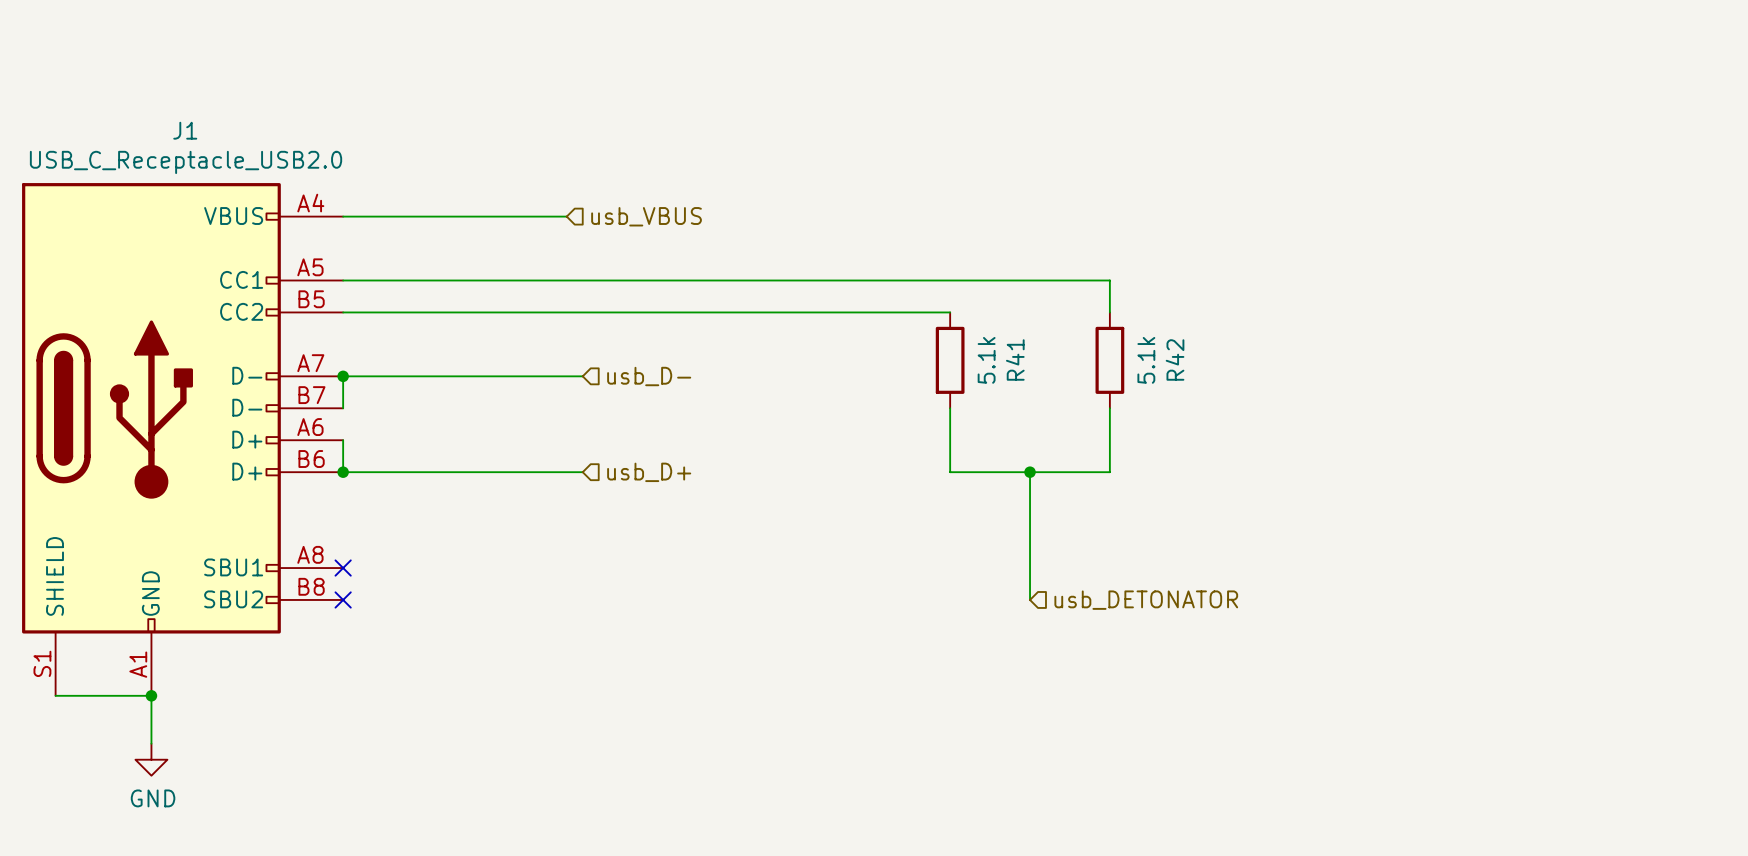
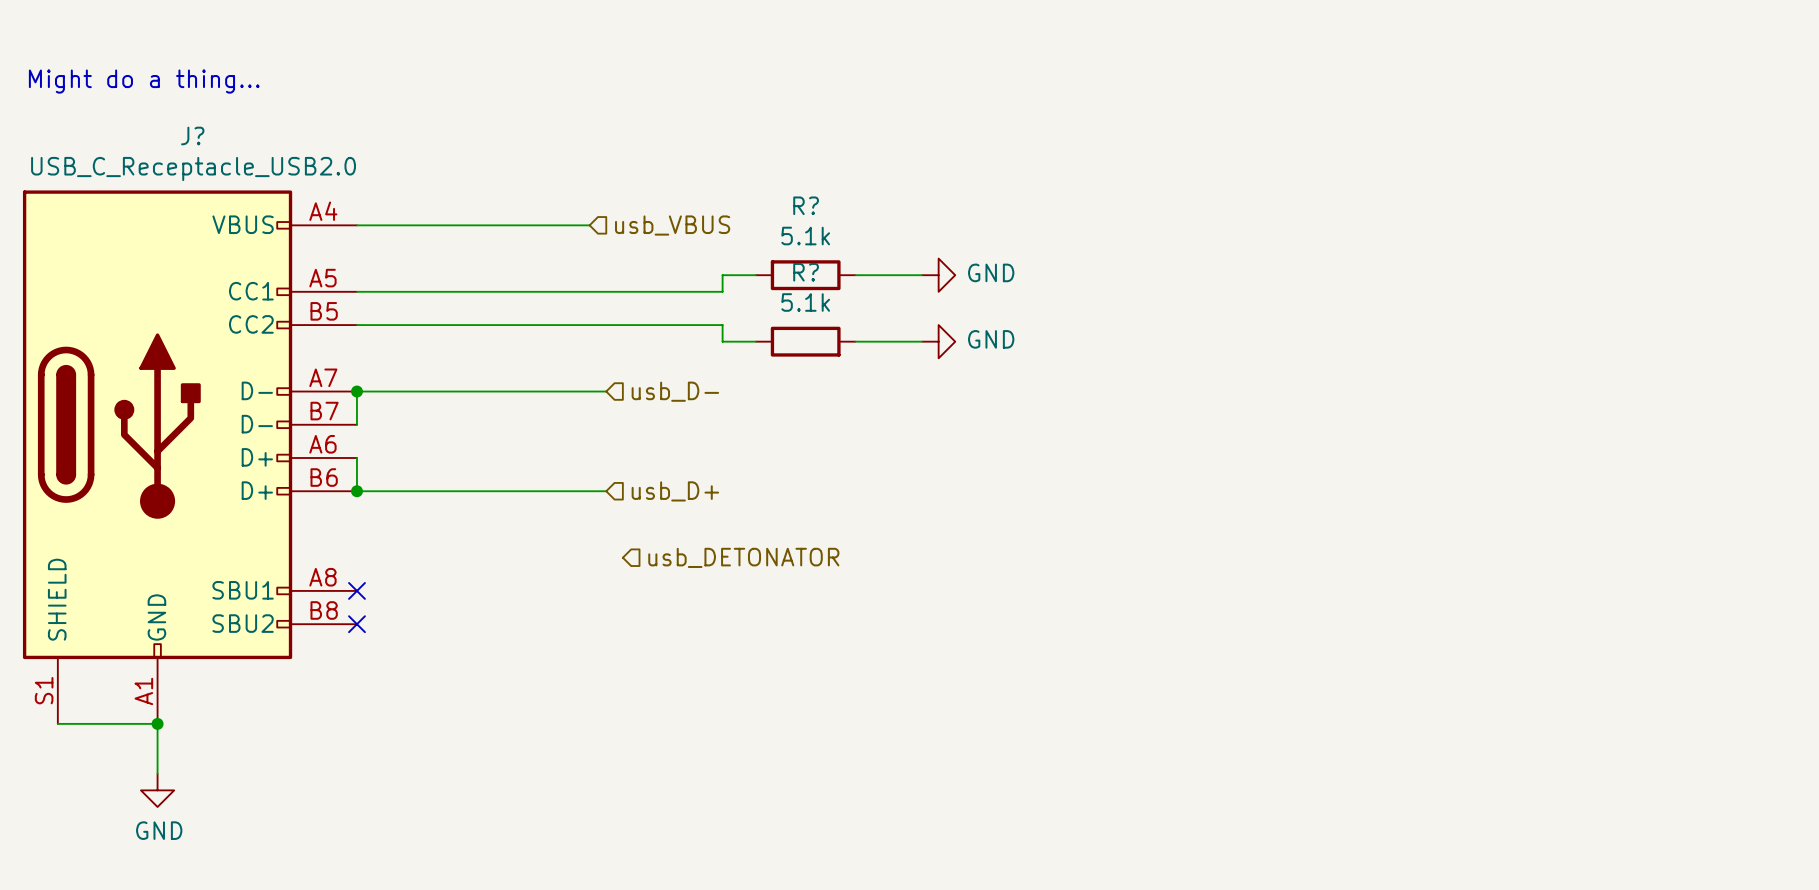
text: none -> Might do a thing... (144, 81)
J1 name: J1 (185, 130) -> J? (192, 135)
R?: none -> 5.1k (805, 275)
wire: none -> (855, 275) (922, 275)
power symbol: none -> GND (938, 275)
wire: (694, 280) (1109, 280) (1109, 312) -> (722, 291) (722, 275) (755, 275)
wire: (694, 312) (950, 312) -> (722, 325) (722, 341) (755, 341)
R?: none -> 5.1k (805, 341)
wire: none -> (855, 341) (922, 341)
power symbol: none -> GND (938, 341)
R41: 5.1k (950, 360) -> none
R42: 5.1k (1109, 360) -> none
wire: (950, 408) (950, 472) (1109, 472) (1109, 408) -> none
wire: (1030, 472) (1030, 599) -> none
junction: (1030, 472) -> none
hierarchical label: none -> usb_DETONATOR (743, 557)
hierarchical label: usb_DETONATOR (1146, 600) -> none

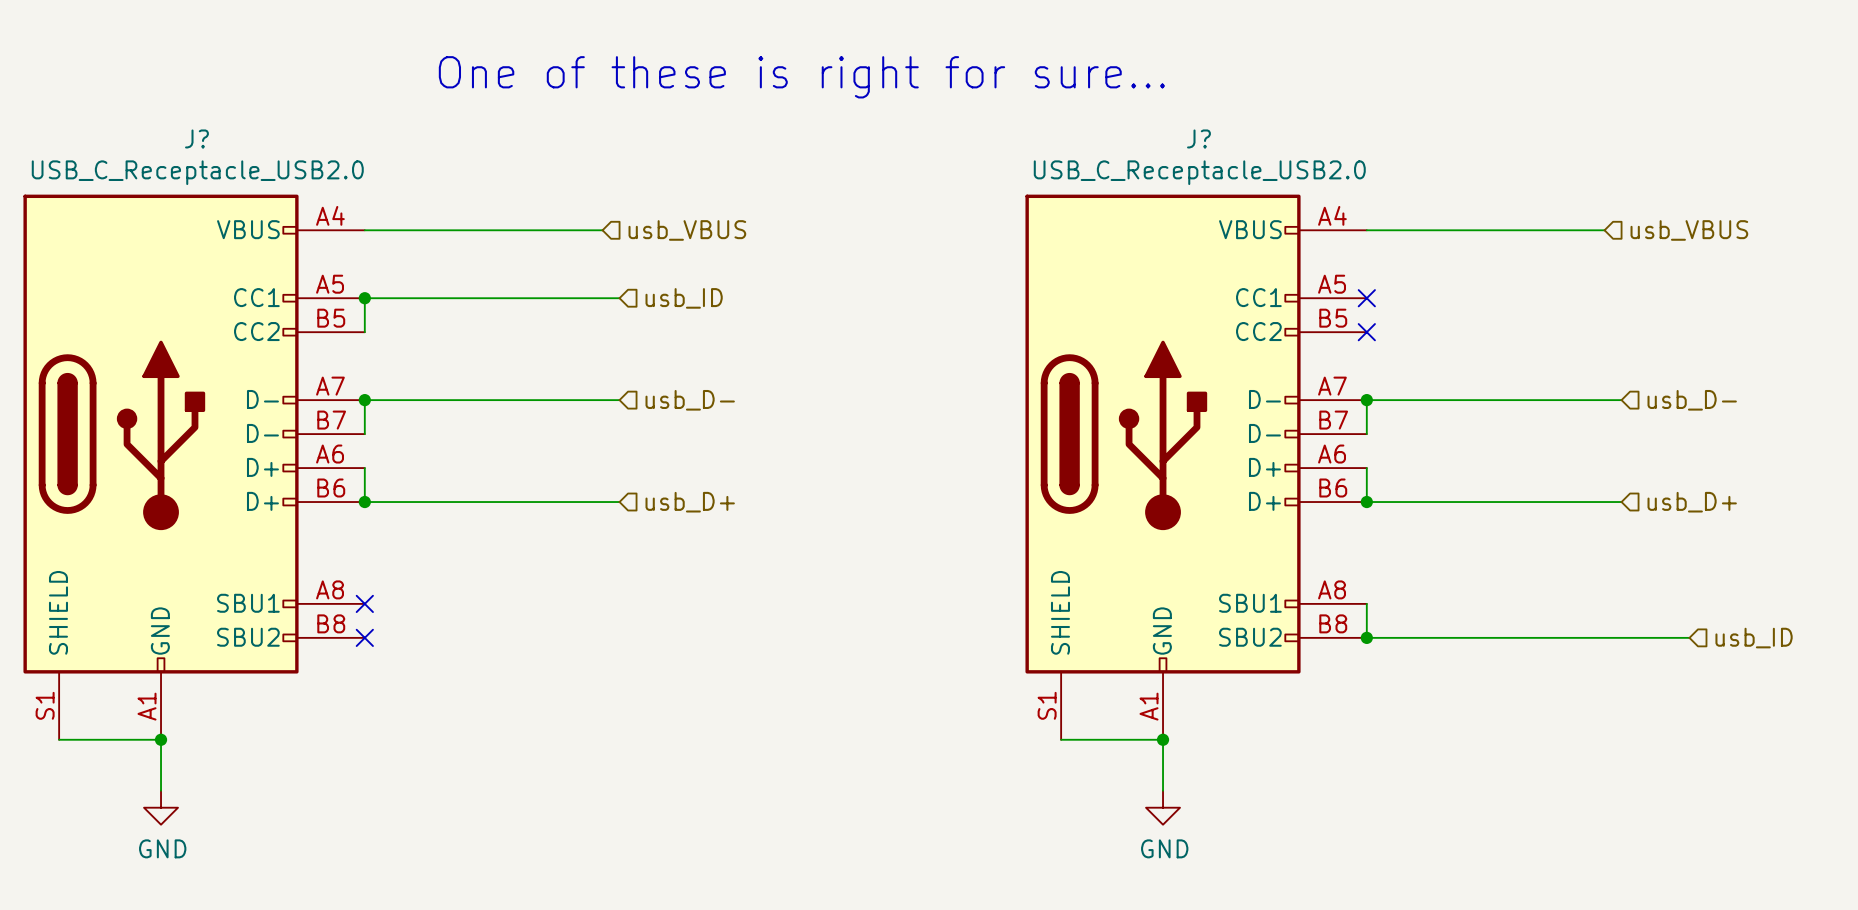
text: none -> One of these is right for sure... (801, 77)
text: Might do a thing... (144, 81) -> none
wire: none -> (1366, 230) (1604, 230)
hierarchical label: none -> usb_VBUS (1689, 230)
wire: (755, 275) (722, 275) (722, 291) (606, 291) -> none
R?: 5.1k (805, 275) -> none
wire: (855, 275) (922, 275) -> none
power symbol: GND (938, 275) -> none
junction: none -> (364, 298)
hierarchical label: none -> usb_ID (684, 298)
no-connect mark: none -> (1366, 298)
wire: (356, 325) (722, 325) (722, 341) (755, 341) -> (364, 332) (364, 298)
no-connect mark: none -> (1366, 332)
R?: 5.1k (805, 341) -> none
wire: (855, 341) (922, 341) -> none
power symbol: GND (938, 341) -> none
junction: none -> (1366, 400)
wire: none -> (1621, 400) (1366, 400) (1366, 434)
hierarchical label: none -> usb_D- (1692, 400)
J?: none -> USB_C_Receptacle_USB2.0 (1196, 467)
wire: none -> (1366, 468) (1366, 502) (1621, 502)
junction: none -> (1366, 502)
hierarchical label: none -> usb_D+ (1692, 502)
hierarchical label: usb_DETONATOR (743, 557) -> none
wire: none -> (1366, 603) (1366, 637) (1689, 637)
junction: none -> (1366, 637)
hierarchical label: none -> usb_ID (1754, 638)
wire: none -> (1061, 739) (1163, 739) (1163, 790)
junction: none -> (1163, 739)
power symbol: none -> GND (1163, 807)

